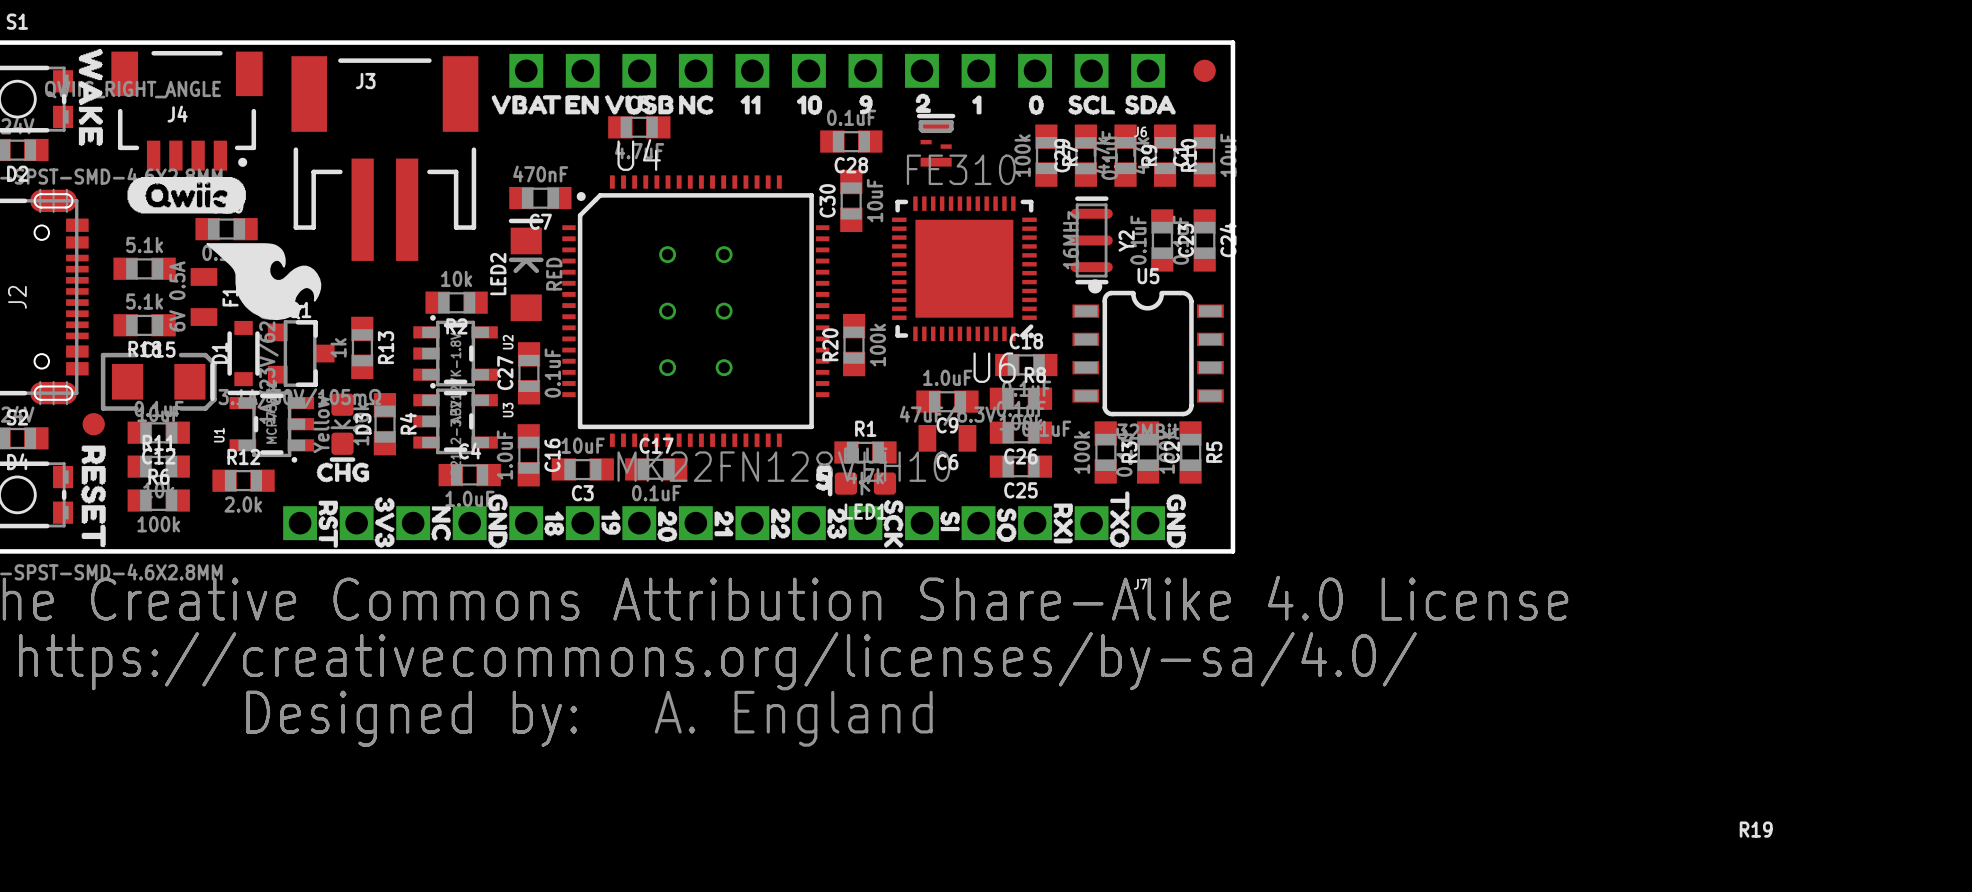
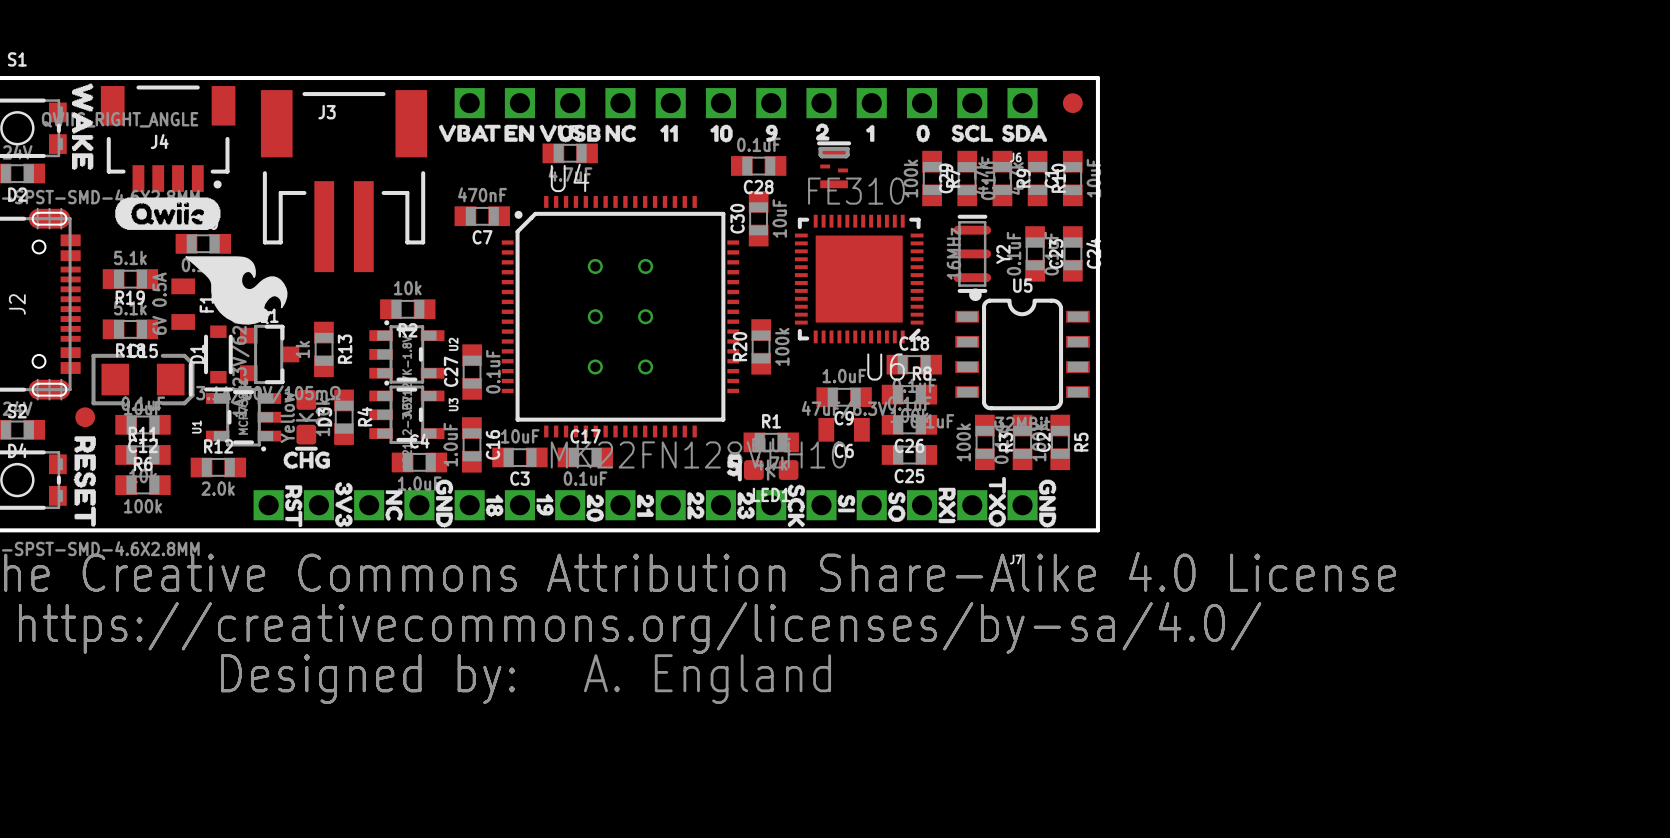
LED2: RED (526, 269) -> none
R19 name position: R19 (1756, 829) -> R19 (130, 297)

